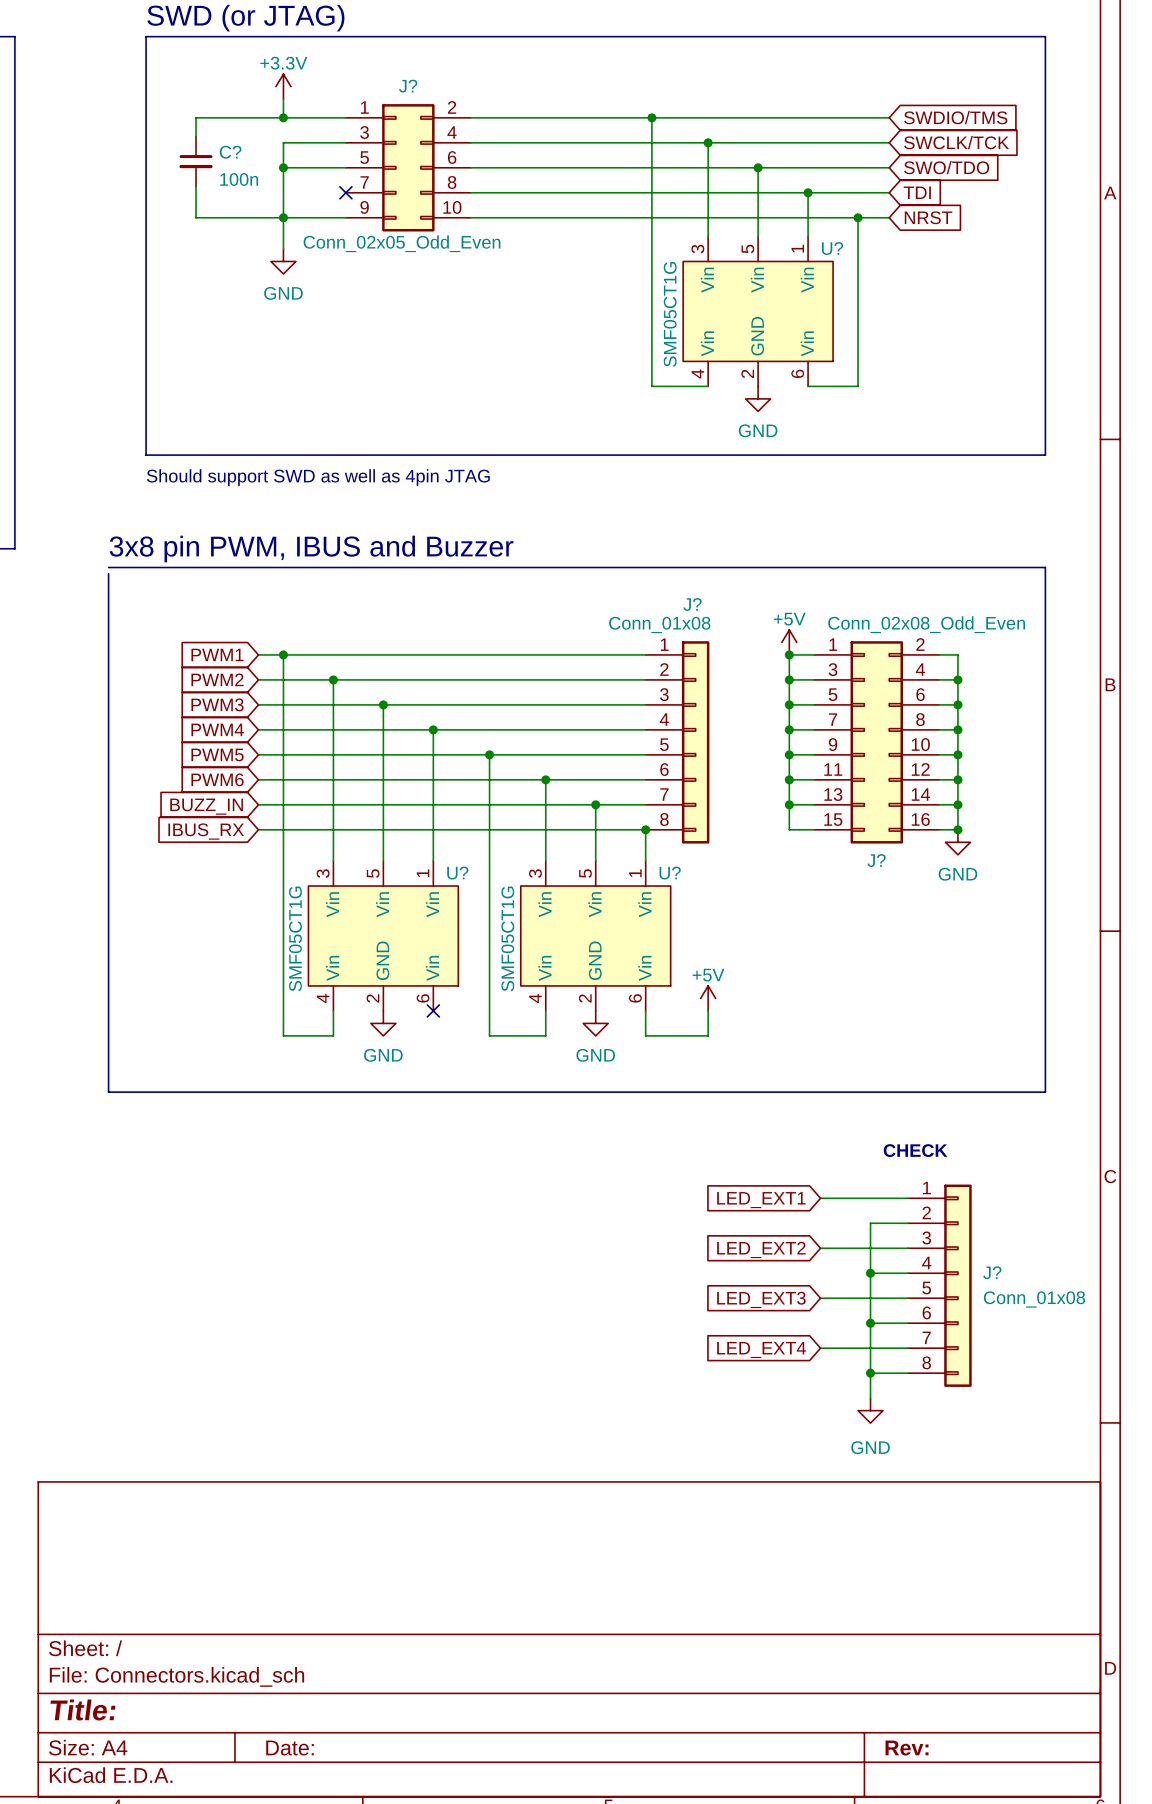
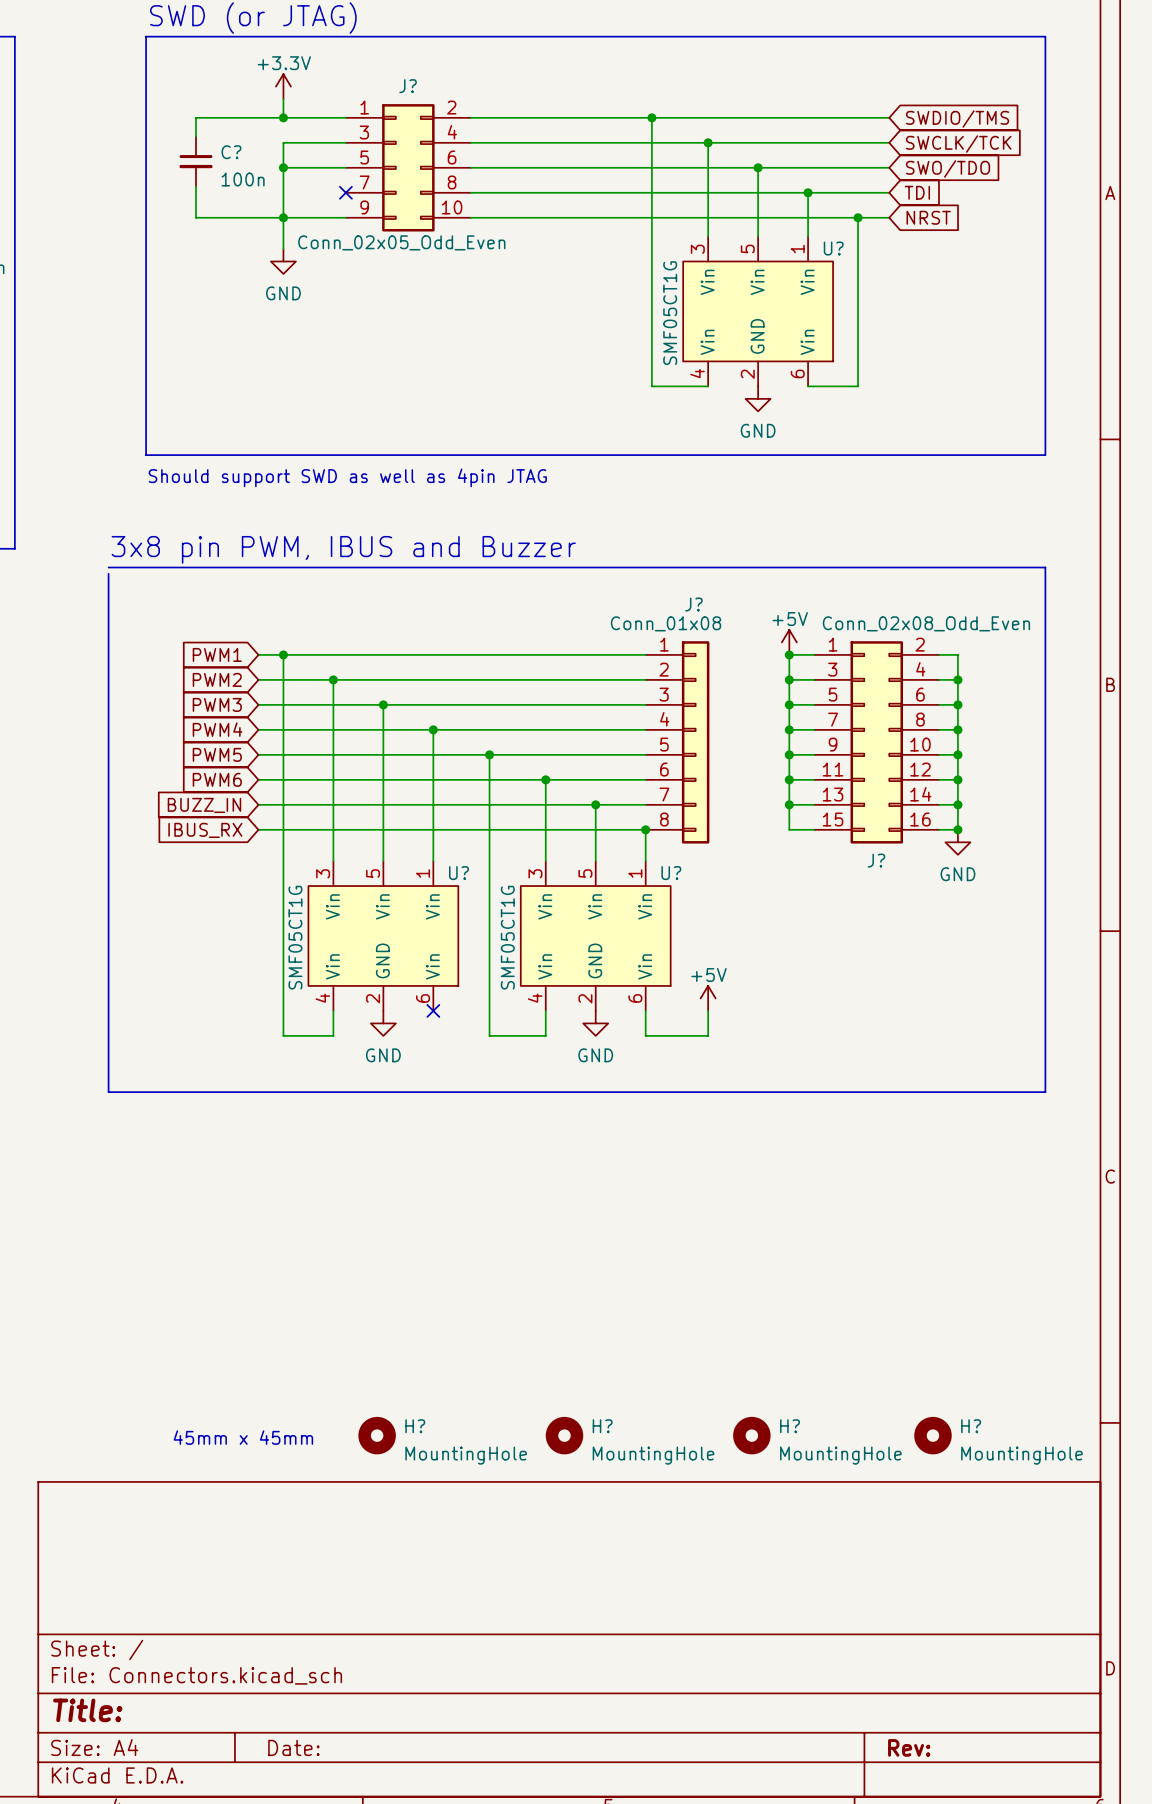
text: CHECK (915, 1150) -> none
wire: (820, 1198) (907, 1198) -> none
global label: LED_EXT1 (761, 1200) -> none
wire: (907, 1223) (870, 1223) (870, 1398) -> none
wire: (820, 1248) (907, 1248) -> none
global label: LED_EXT2 (761, 1249) -> none
wire: (870, 1273) (907, 1273) -> none
junction: (870, 1273) -> none
J?: Conn_01x08 (939, 1285) -> none
wire: (820, 1298) (907, 1298) -> none
global label: LED_EXT3 (761, 1299) -> none
wire: (870, 1323) (907, 1323) -> none
junction: (870, 1323) -> none
wire: (820, 1348) (907, 1348) -> none
global label: LED_EXT4 (761, 1349) -> none
wire: (870, 1373) (907, 1373) -> none
junction: (870, 1373) -> none
power symbol: GND (870, 1410) -> none
H?: none -> MountingHole (377, 1435)
H?: none -> MountingHole (564, 1435)
H?: none -> MountingHole (751, 1435)
H?: none -> MountingHole (932, 1435)
text: none -> 45mm x 45mm (243, 1437)

